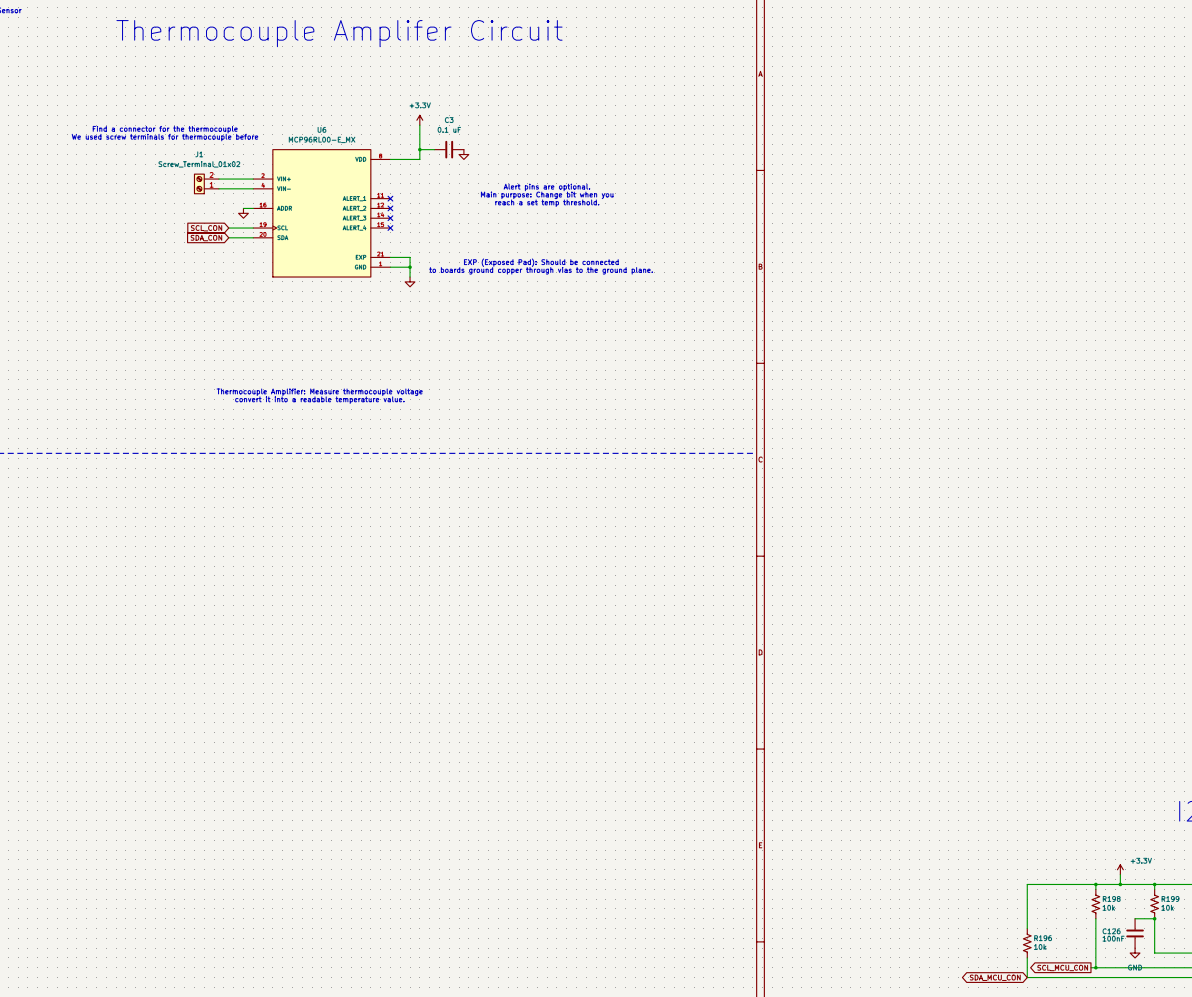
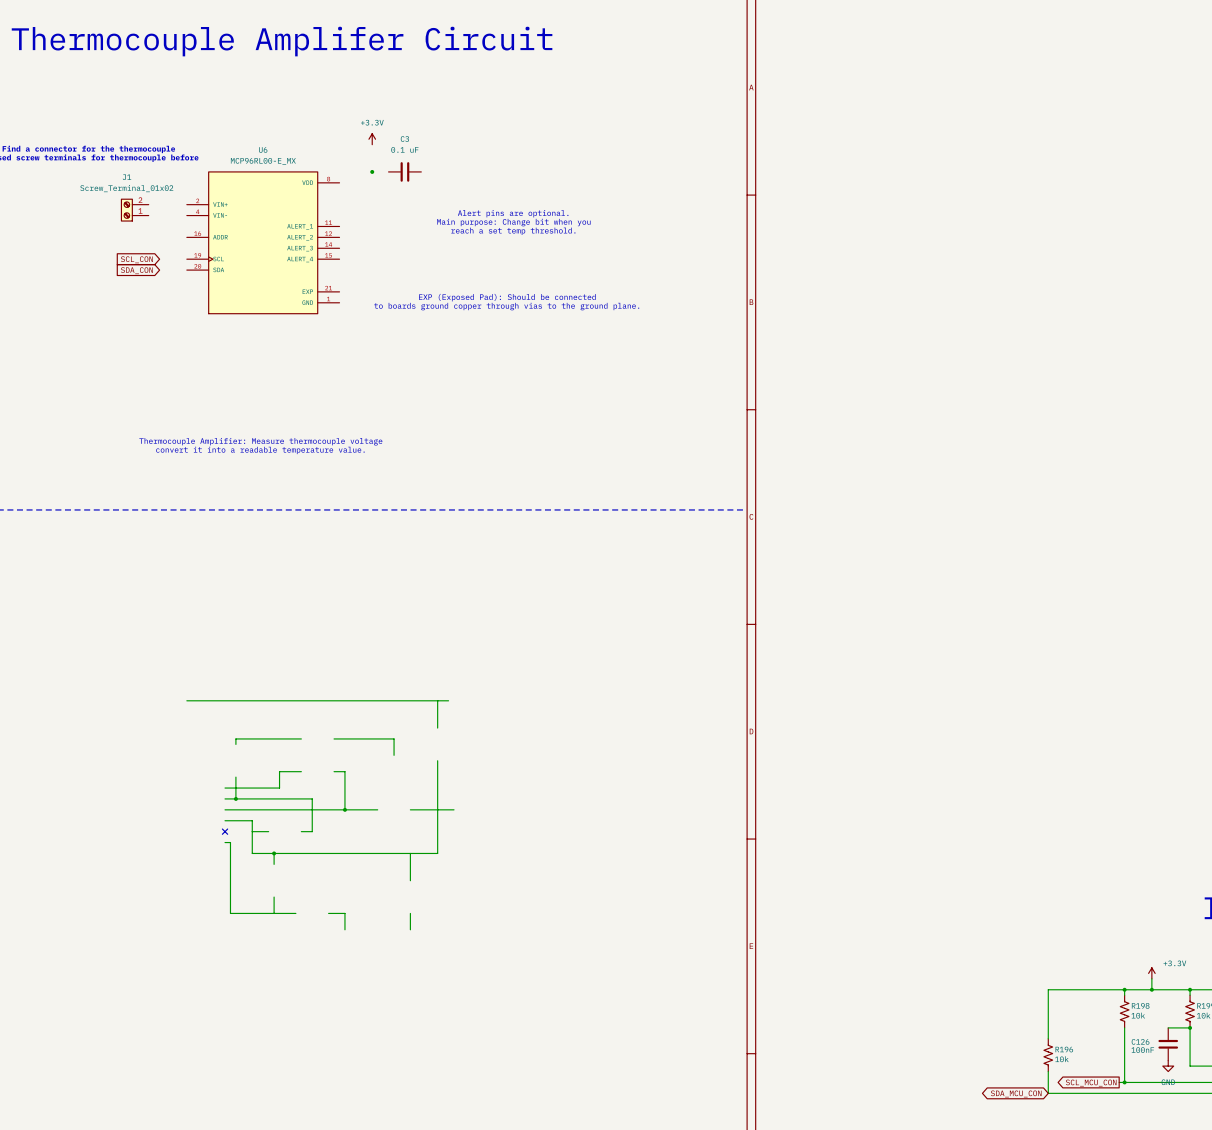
wire: (419, 125) (419, 159) (390, 159) -> none
wire: (419, 149) (434, 149) -> none
power symbol: (463, 154) -> none
wire: (218, 179) (253, 179) -> none
wire: (218, 188) (253, 188) -> none
no-connect mark: (390, 198) -> none
wire: (243, 208) (253, 208) -> none
no-connect mark: (390, 208) -> none
power symbol: (243, 213) -> none
no-connect mark: (390, 218) -> none
wire: (228, 228) (253, 228) -> none
no-connect mark: (390, 228) -> none
wire: (228, 237) (253, 237) -> none
wire: (390, 257) (410, 257) (410, 277) -> none
wire: (390, 267) (410, 267) -> none
junction: (410, 267) -> none
power symbol: (410, 281) -> none
wire: none -> (186, 700) (448, 700)
wire: none -> (437, 700) (437, 728)
wire: none -> (301, 738) (235, 738) (235, 744)
wire: none -> (334, 738) (394, 738) (394, 755)
wire: none -> (437, 760) (437, 853) (252, 853) (252, 820) (225, 820)
wire: none -> (301, 771) (279, 771) (279, 788) (225, 788)
wire: none -> (334, 771) (344, 771) (344, 809)
wire: none -> (235, 777) (235, 798)
wire: none -> (225, 798) (312, 798) (312, 831) (301, 831)
junction: none -> (235, 798)
wire: none -> (225, 809) (377, 809)
junction: none -> (344, 809)
wire: none -> (410, 809) (454, 809)
no-connect mark: none -> (225, 831)
wire: none -> (252, 831) (268, 831)
wire: none -> (225, 842) (230, 842) (230, 913) (295, 913)
wire: none -> (274, 853) (274, 864)
junction: none -> (274, 853)
wire: none -> (410, 853) (410, 880)
wire: none -> (274, 897) (274, 913)
wire: none -> (328, 913) (344, 913) (344, 929)
wire: none -> (410, 913) (410, 929)

